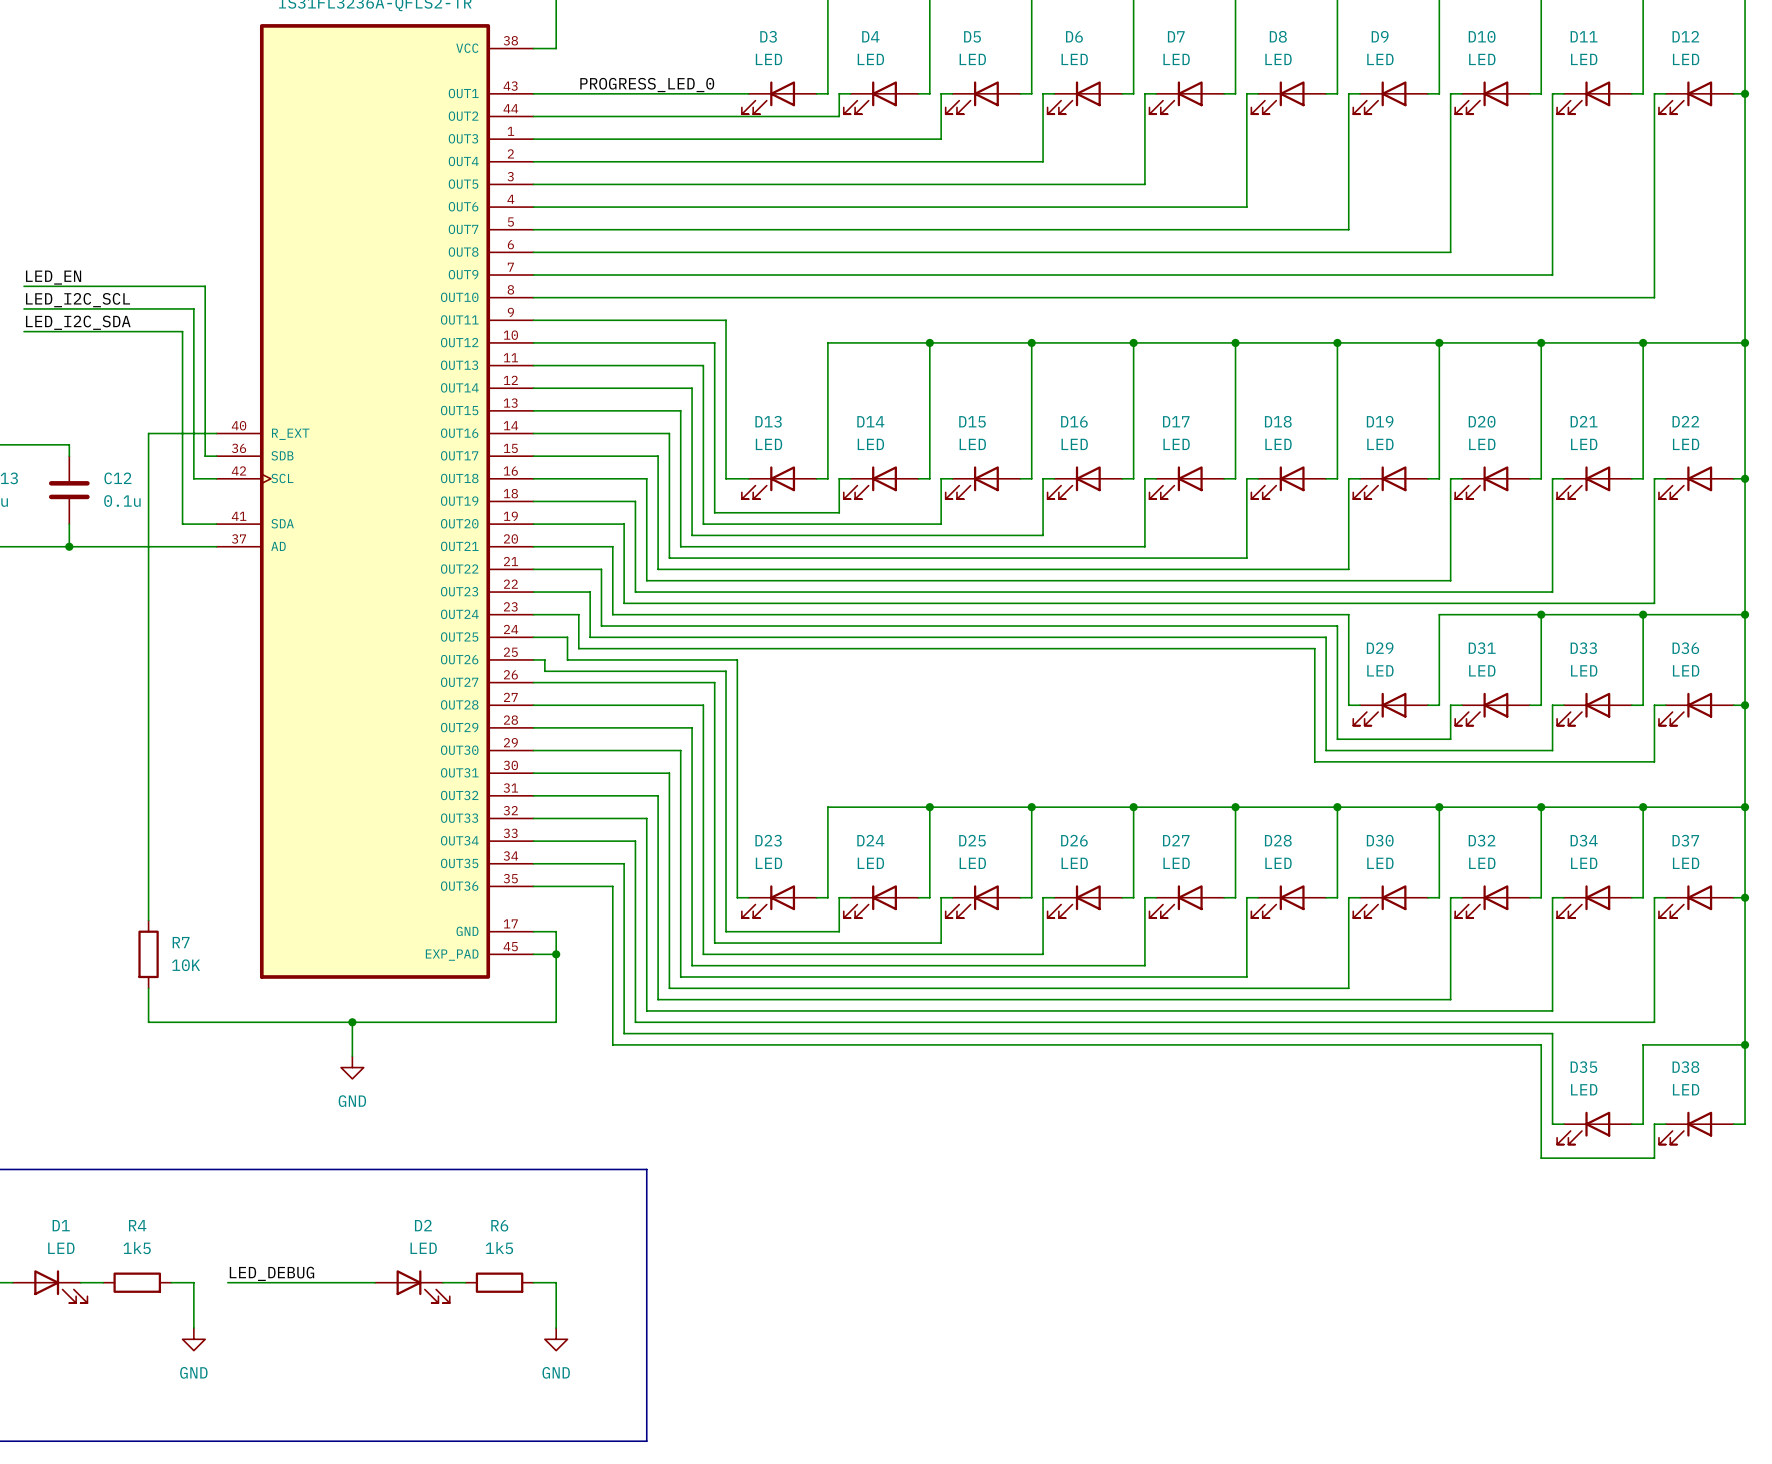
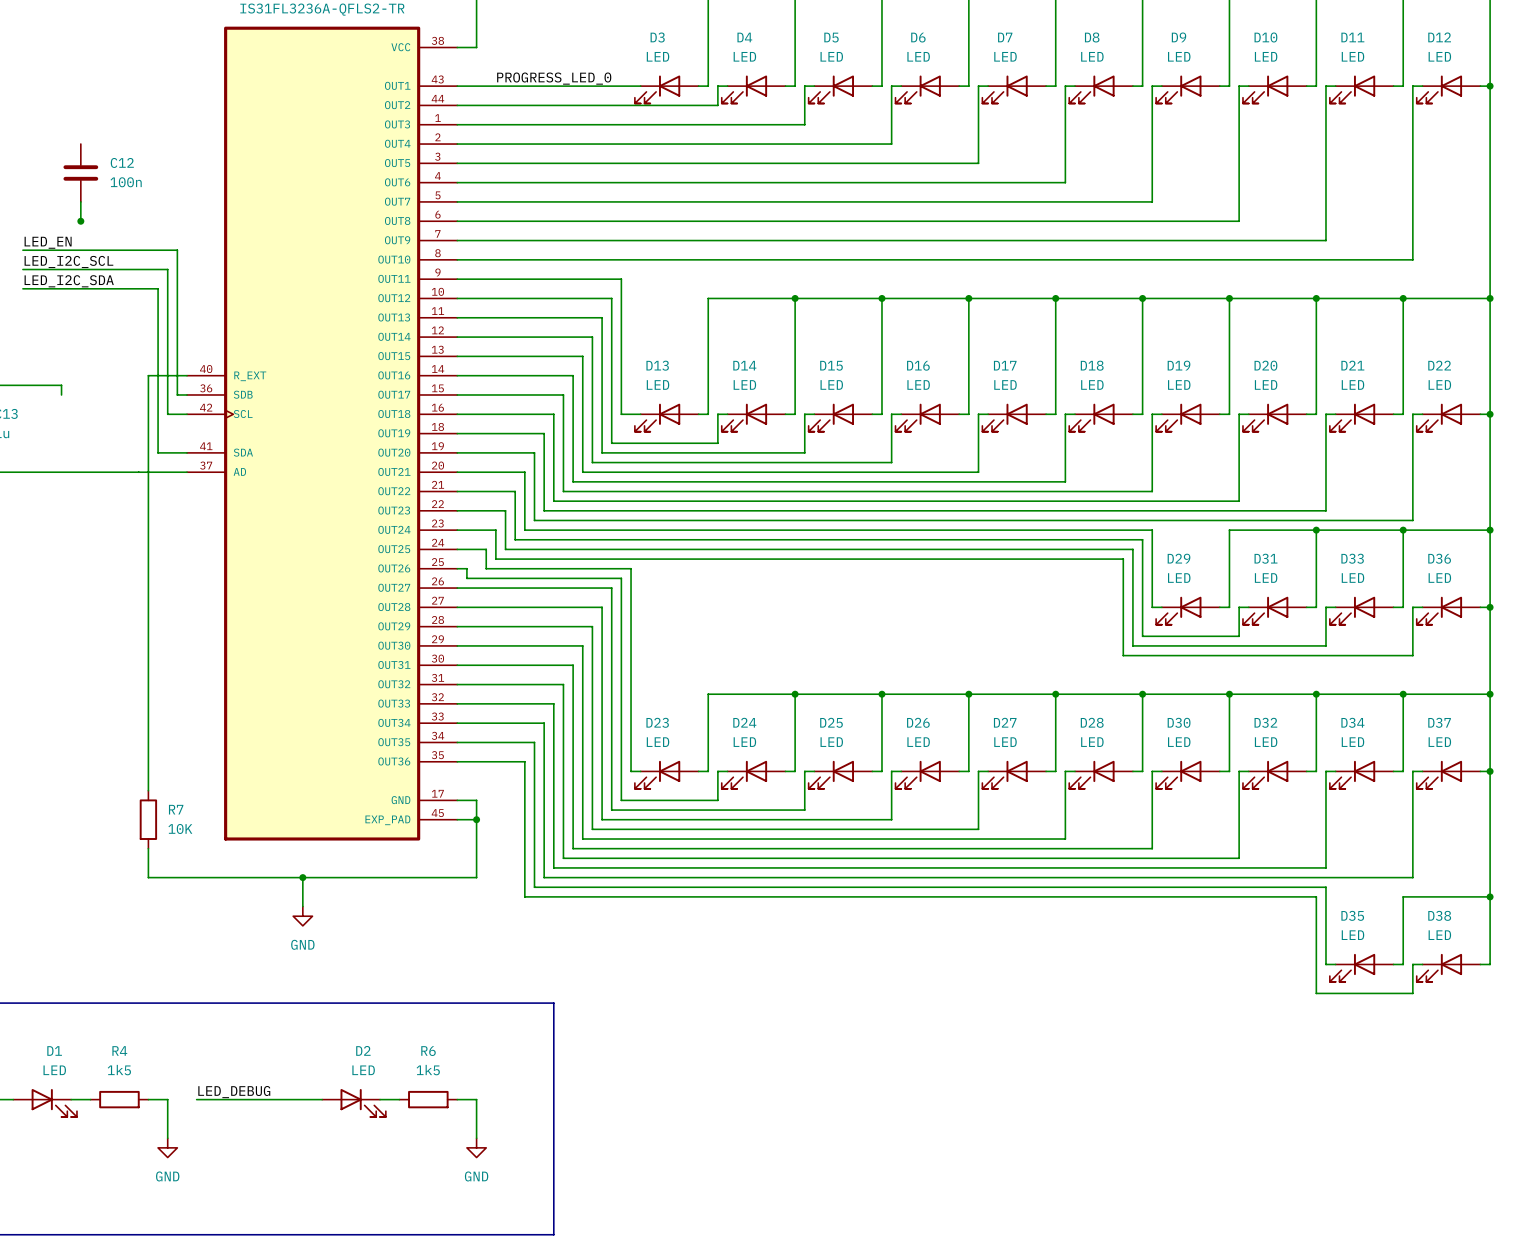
wire: none -> (80, 201) (80, 221)
junction: none -> (80, 221)
wire: (171, 433) (148, 433) (148, 920) -> (148, 375) (148, 790)
C12 position: (69, 490) -> (80, 172)
C12 value: 0.1u (122, 501) -> 100n (126, 182)
wire: (69, 524) (69, 546) -> none
junction: (69, 546) -> none
R7 position: (148, 954) -> (148, 819)
wire: (148, 988) (148, 1022) (171, 1022) -> (148, 848) (148, 877)

